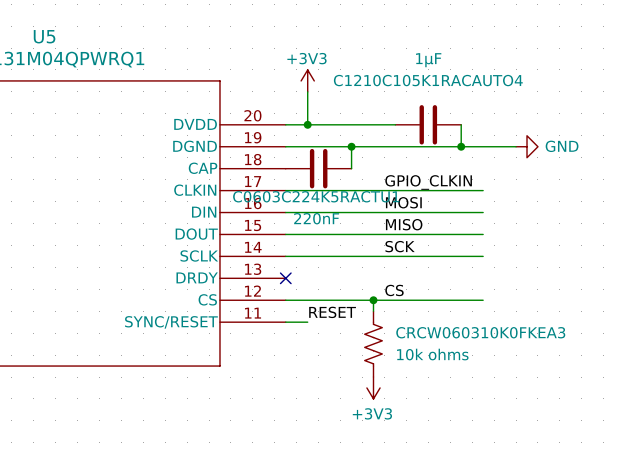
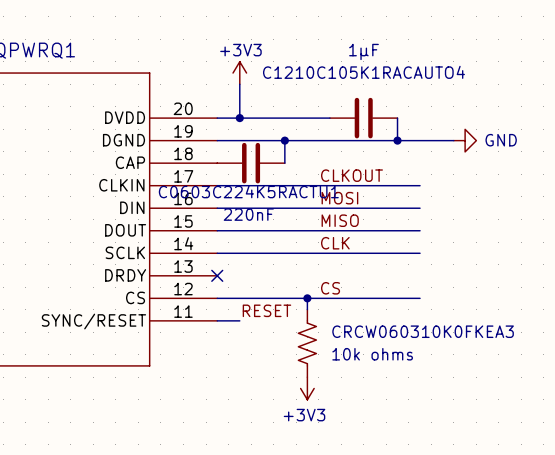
label: GPIO_CLKIN (428, 182) -> CLKOUT (352, 175)
label: SCK (400, 246) -> CLK (335, 243)

